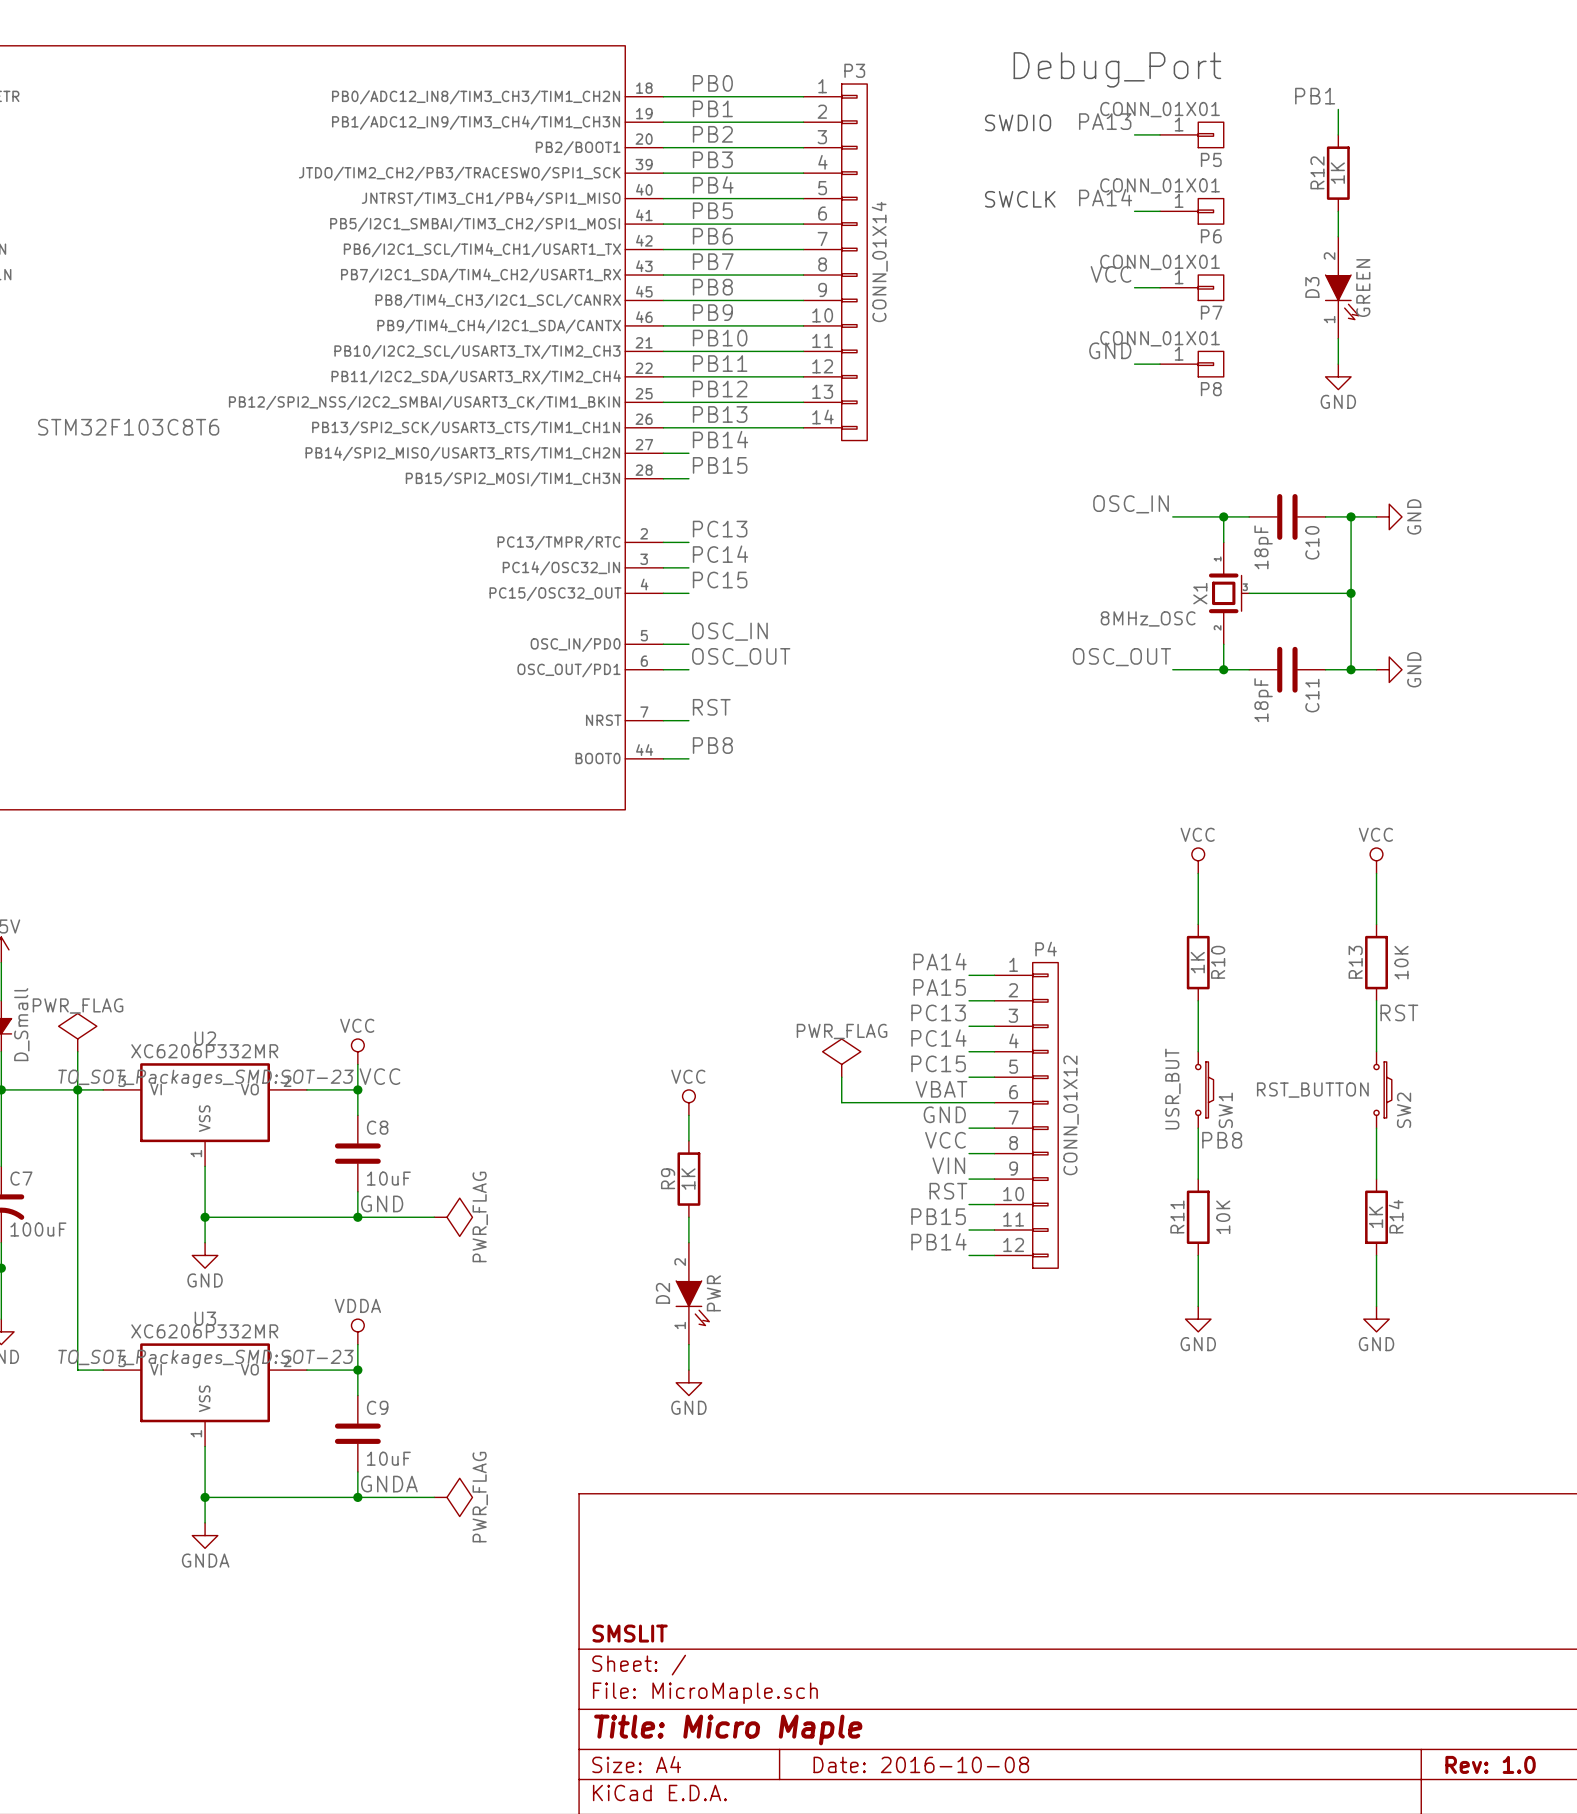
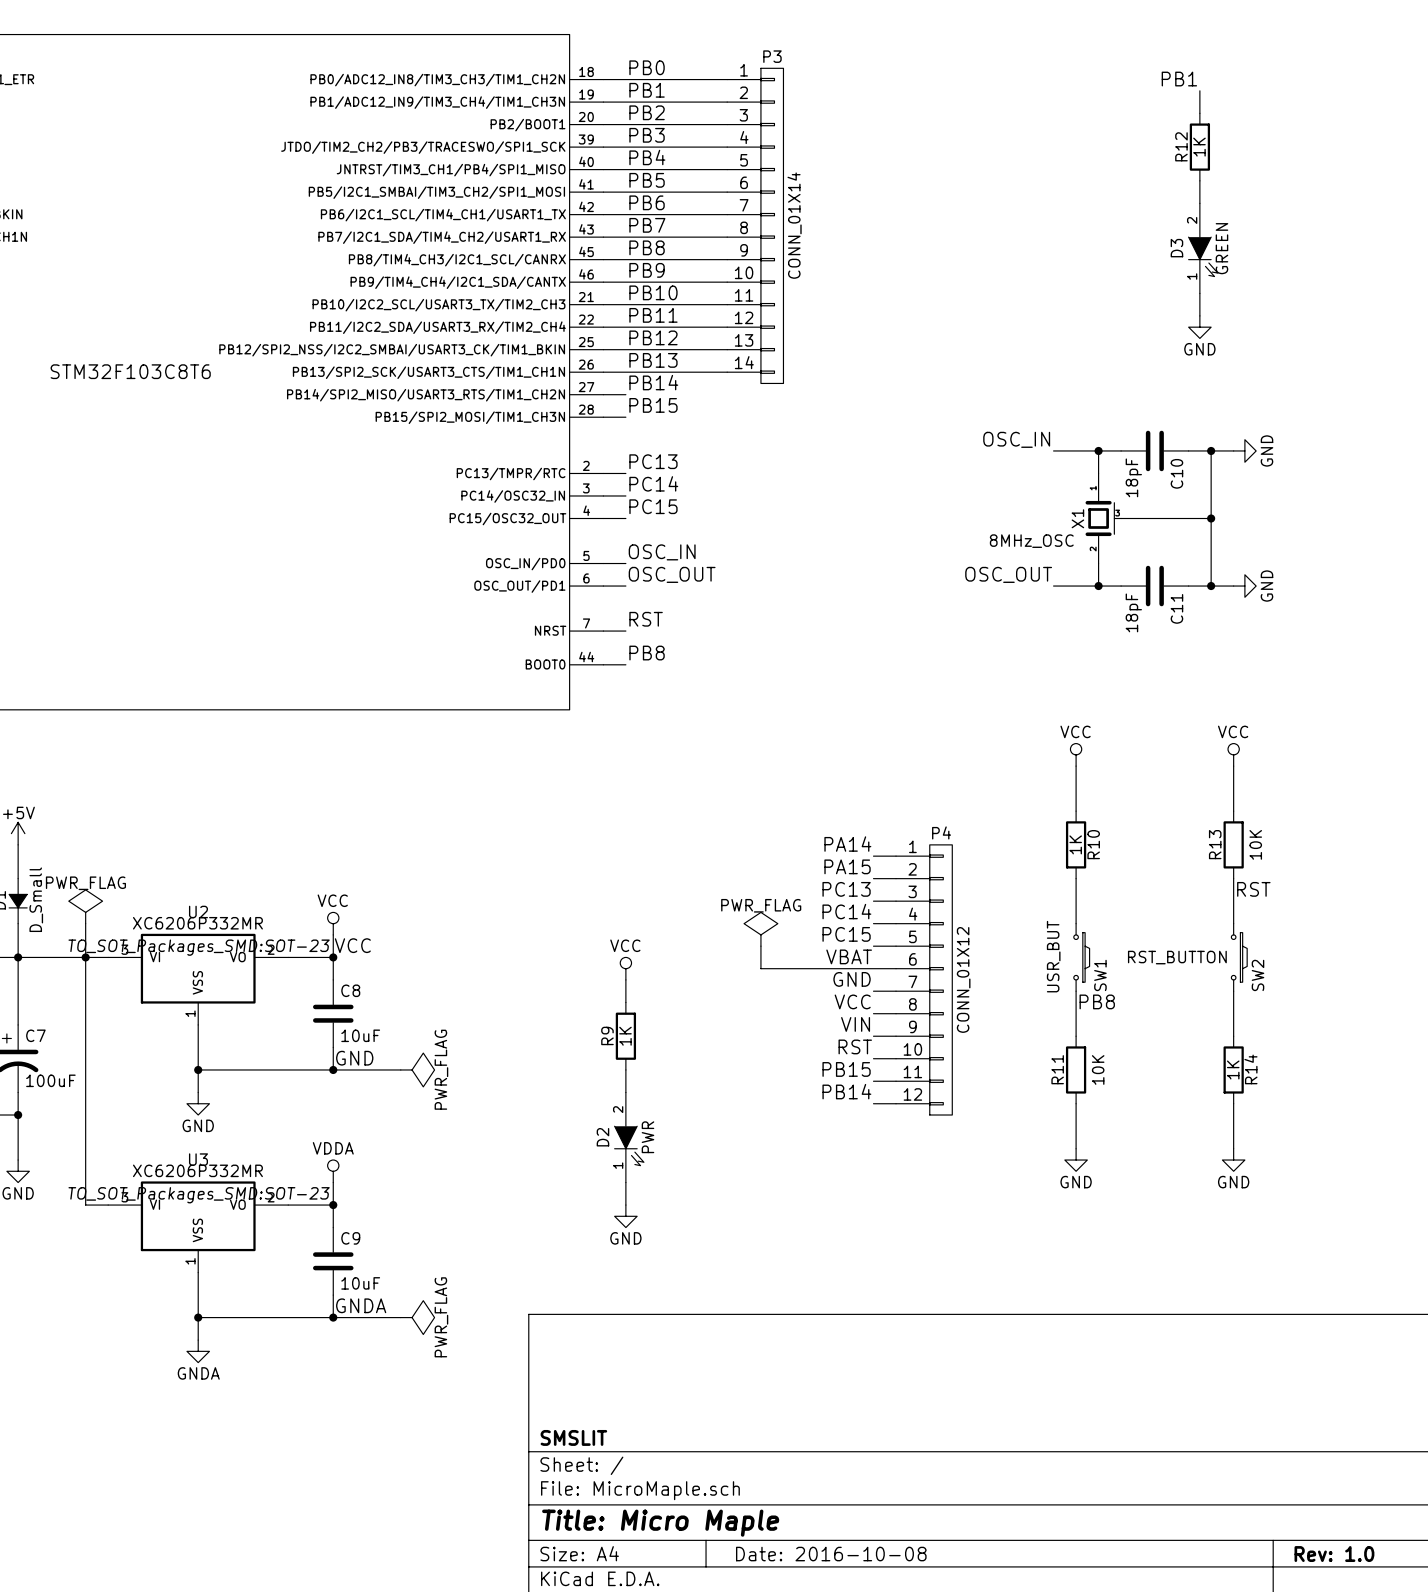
text: Debug_Port (1117, 69) -> none
label: PA13 (1105, 121) -> none
text: SWDIO (1018, 122) -> none
wire: (1134, 134) (1160, 134) -> none
P5: CONN_01X01 (1191, 134) -> none
label: PA14 (1105, 197) -> none
text: SWCLK (1020, 199) -> none
wire: (1134, 211) (1160, 211) -> none
P6: CONN_01X01 (1191, 211) -> none
label: VCC (1111, 274) -> none
wire: (1134, 287) (1160, 287) -> none
P7: CONN_01X01 (1191, 287) -> none
label: GND (1110, 350) -> none
wire: (1134, 364) (1160, 364) -> none
P8: CONN_01X01 (1191, 364) -> none

